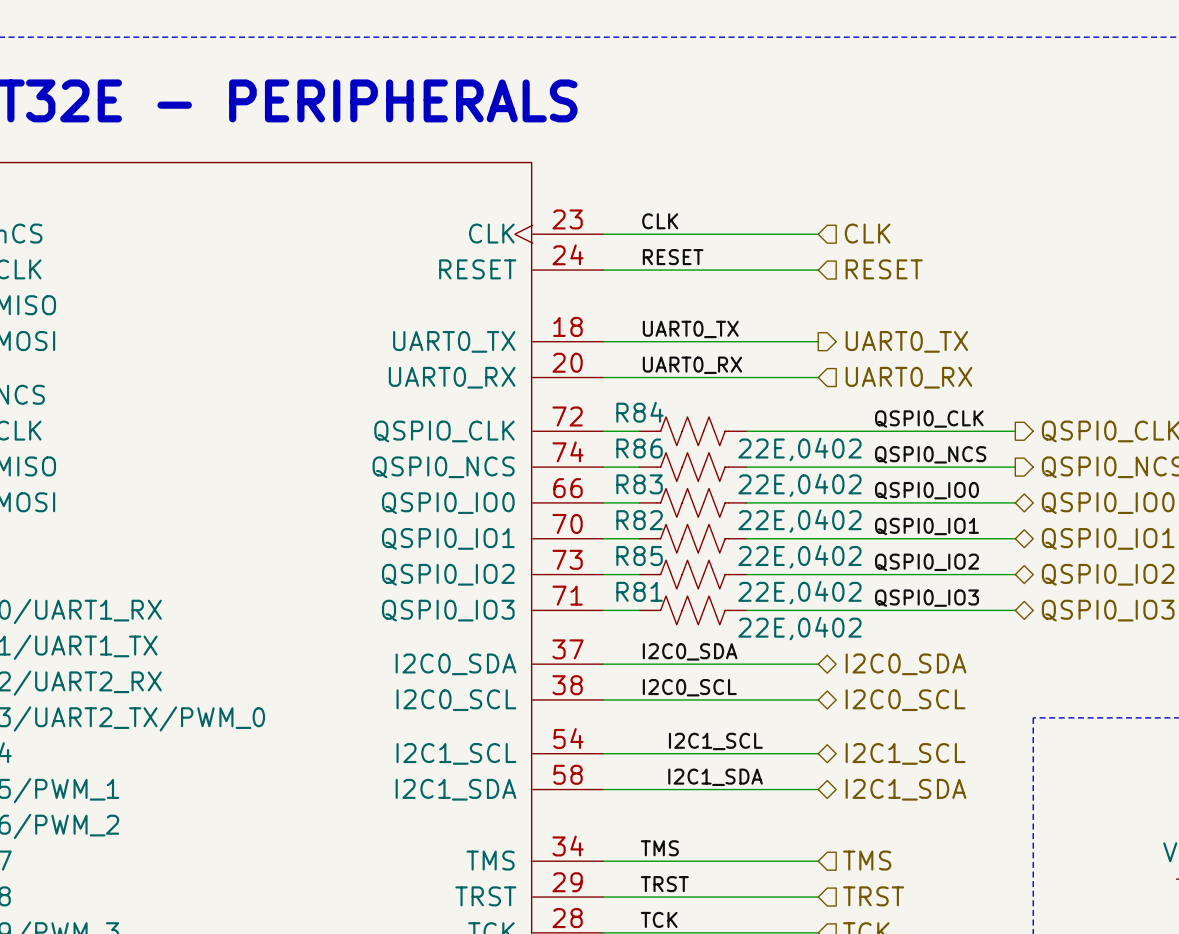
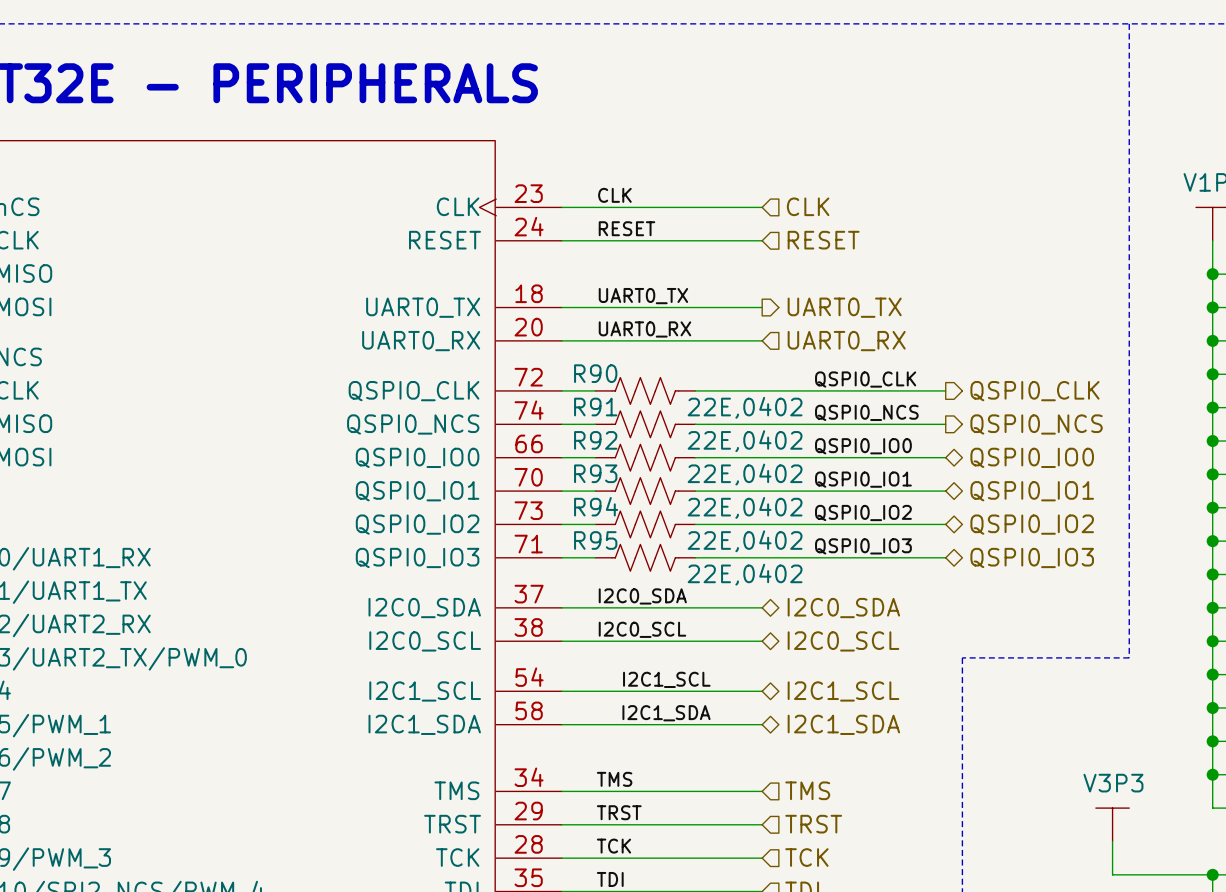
R84 name: R84 (639, 412) -> R90 (595, 373)
R86 name: R86 (639, 448) -> R91 (595, 407)
R83 name: R83 (639, 484) -> R92 (595, 440)
R82 name: R82 (639, 520) -> R93 (595, 473)
R85 name: R85 (639, 556) -> R94 (596, 506)
R81 name: R81 (639, 591) -> R95 (595, 540)

